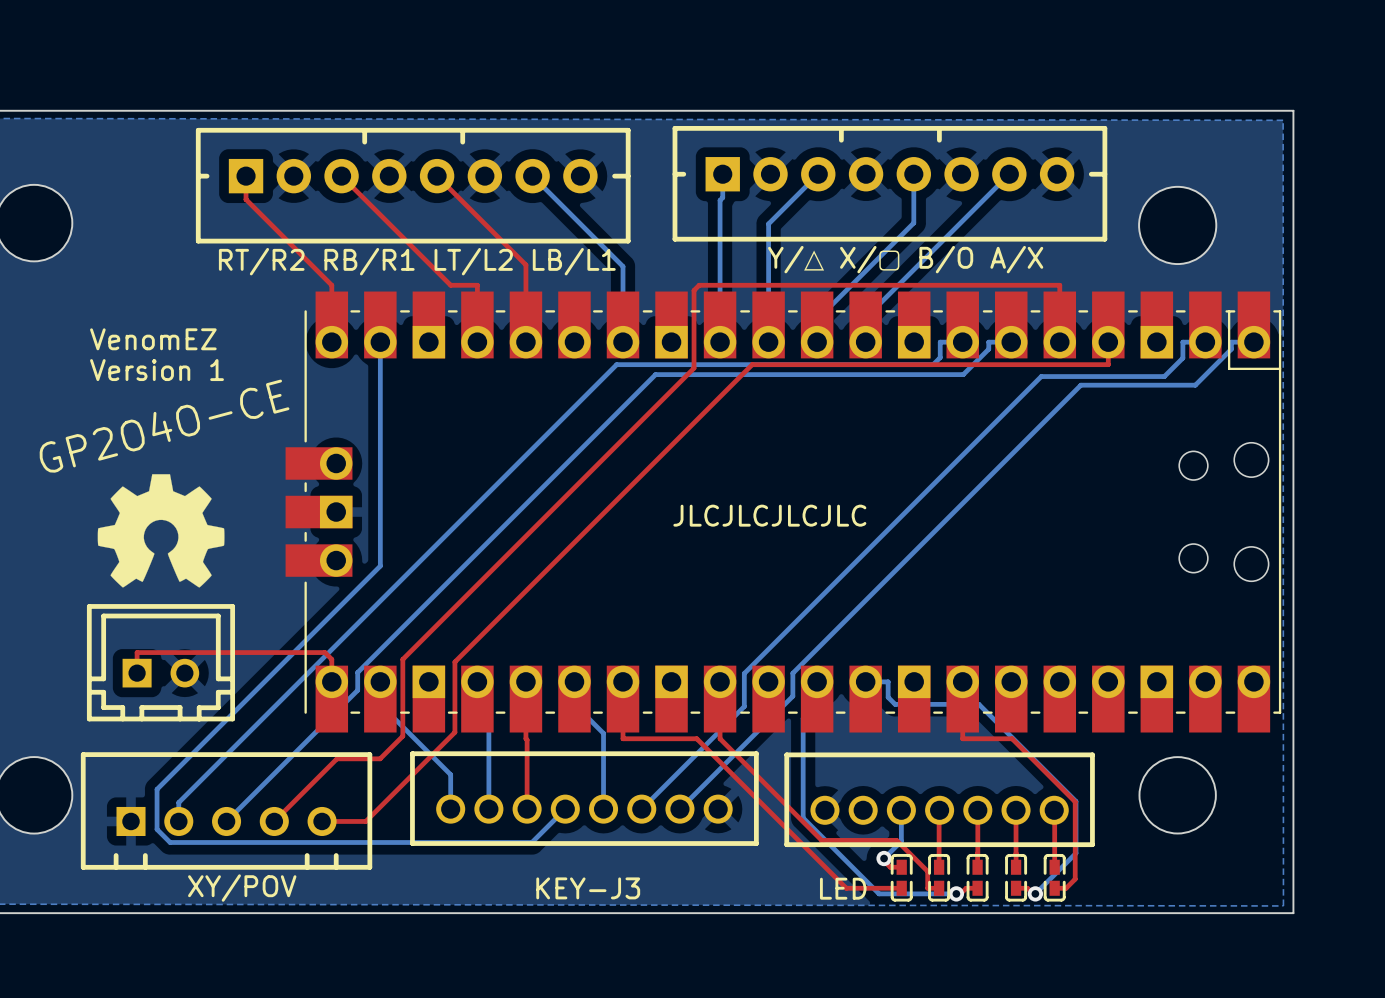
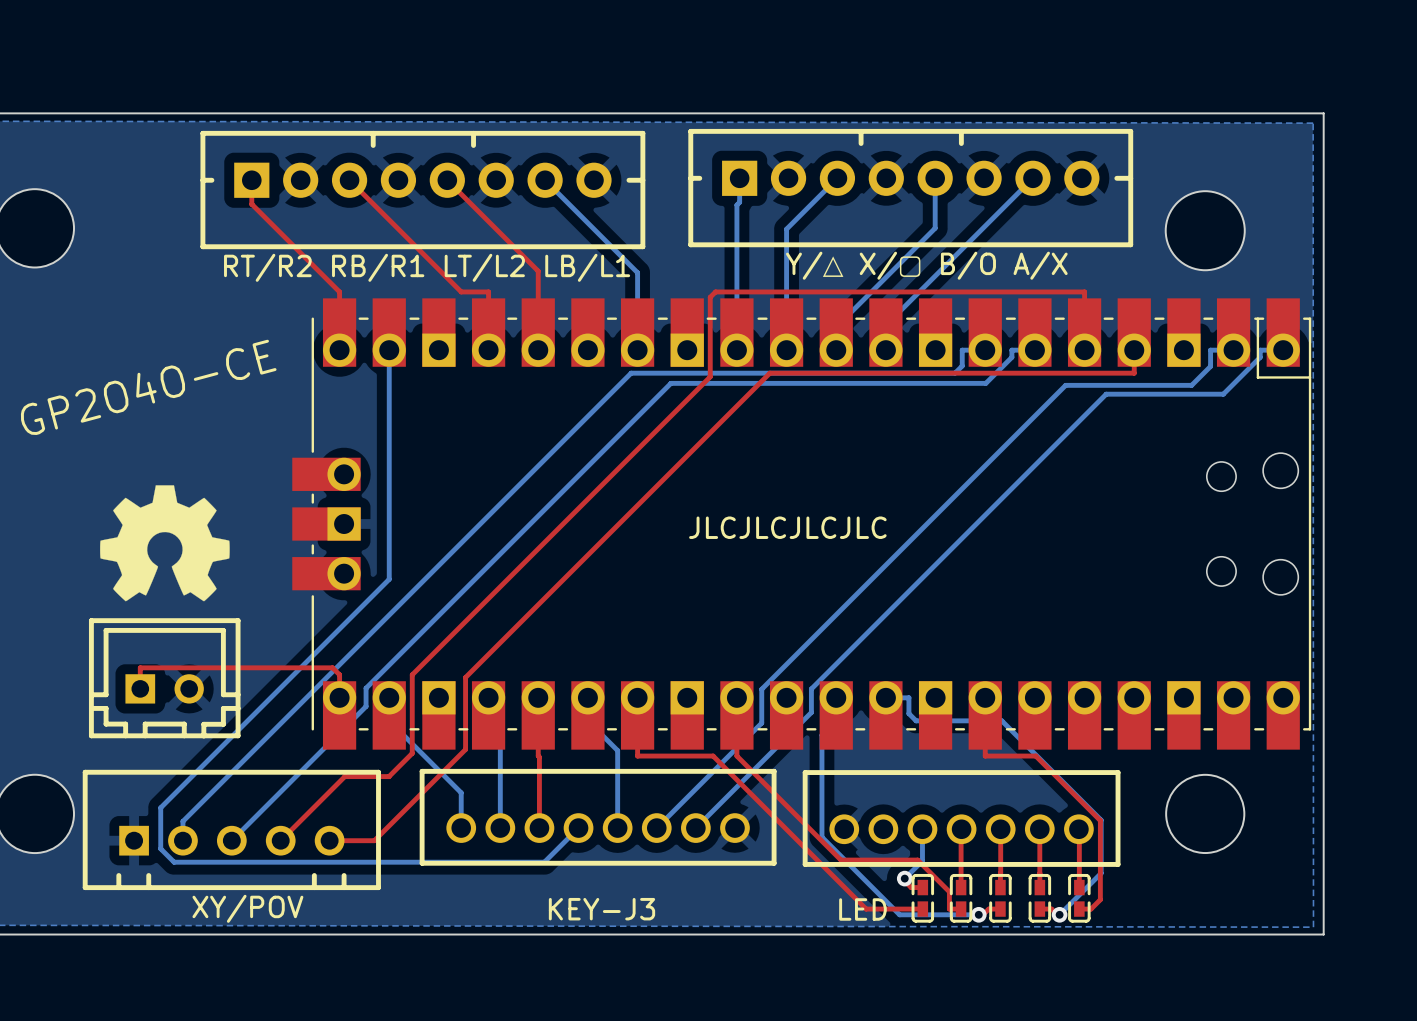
text: VenomEZ (153, 339) -> none
text: Version 1 (157, 370) -> none
text position: GP2O4O-CE (164, 426) -> GP2O4O-CE (148, 387)

